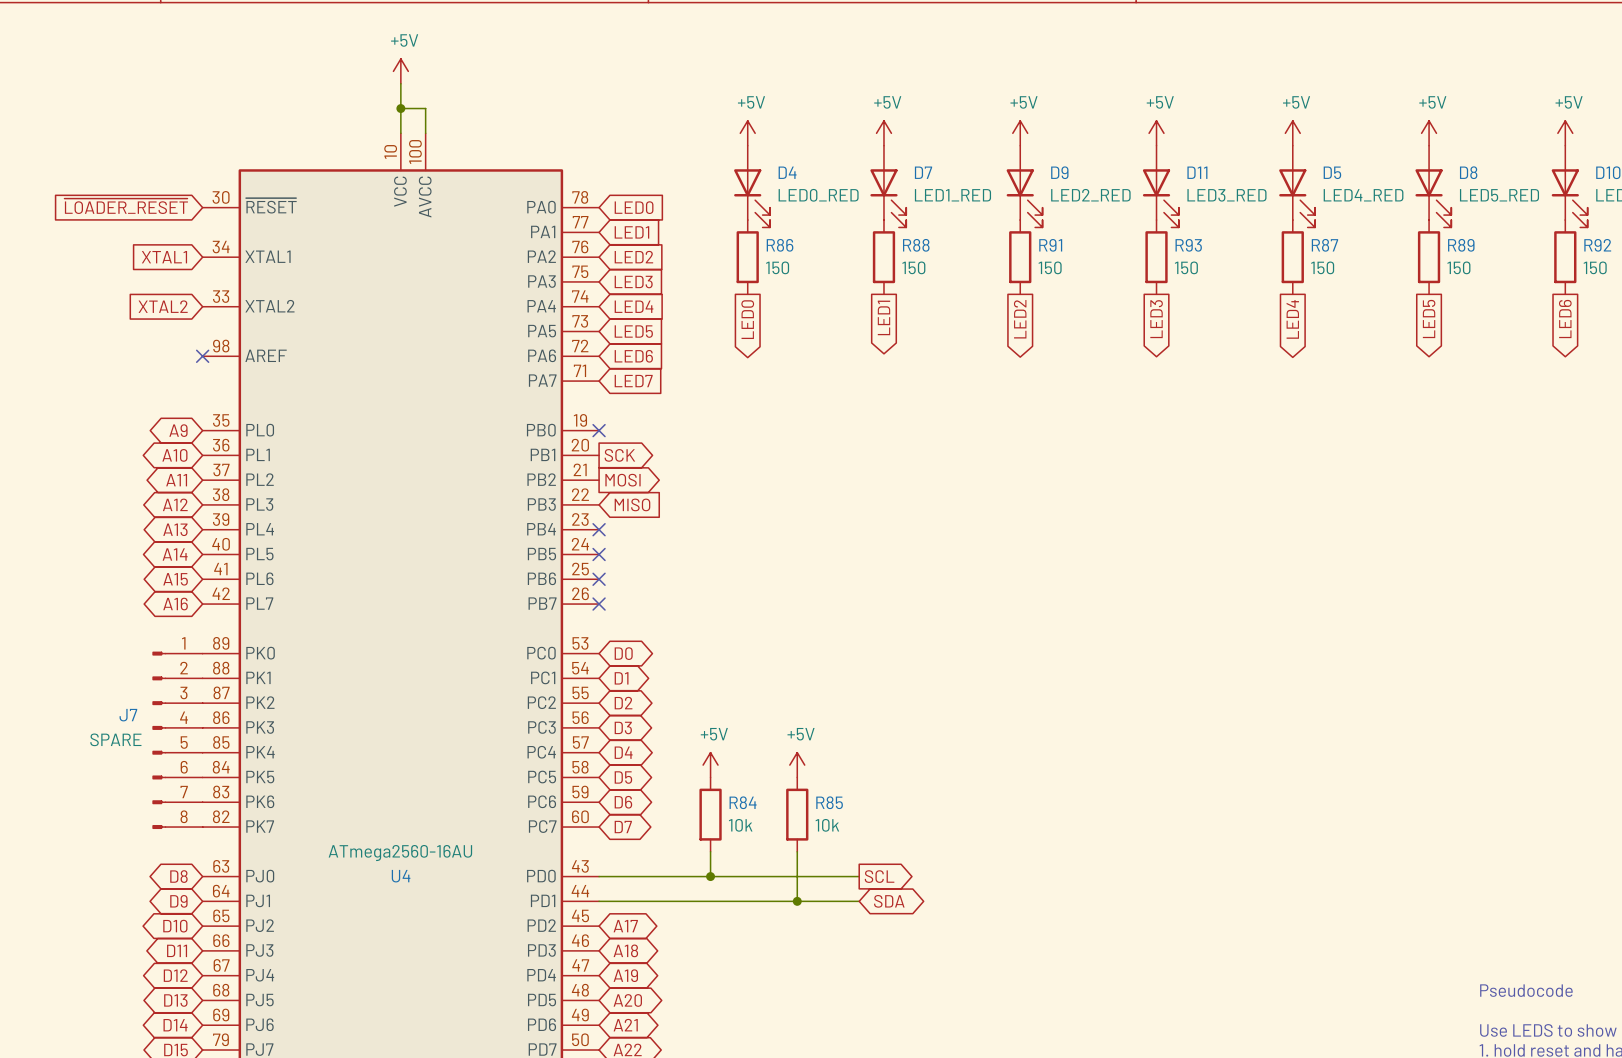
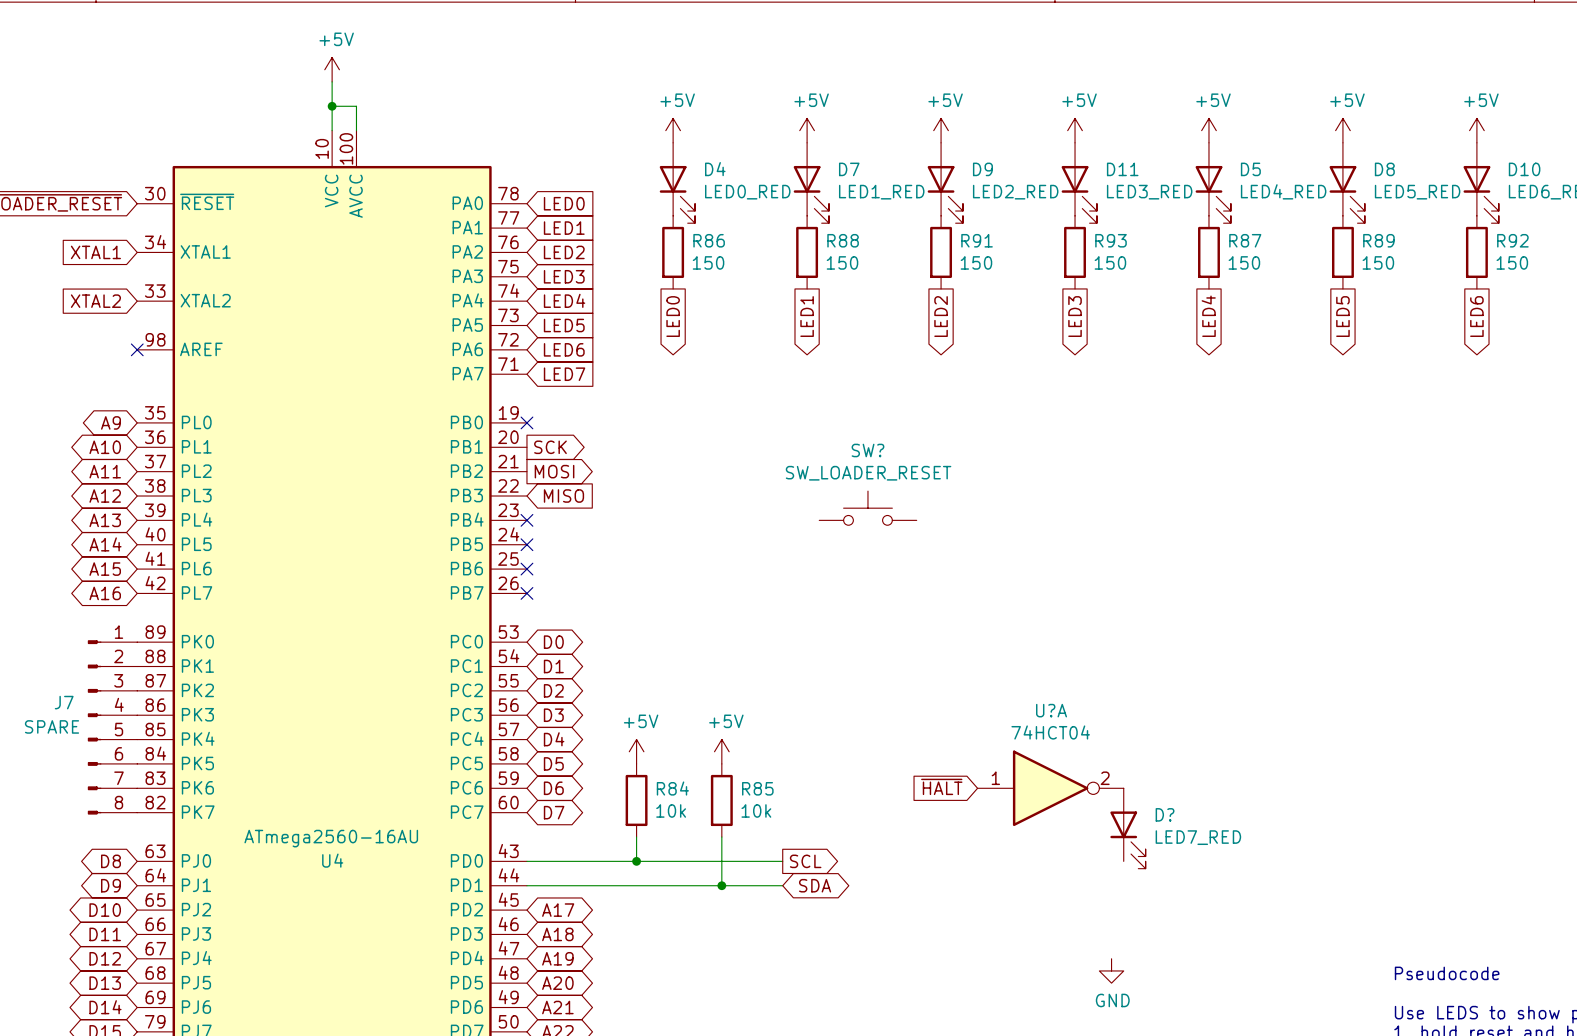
SW?: none -> SW_LOADER_RESET (867, 508)
global label: none -> ~{HALT} (941, 786)
U?A: none -> 74HCT04 (1050, 788)
D?: none -> LED7_RED (1127, 828)
power symbol: none -> GND (1111, 970)

